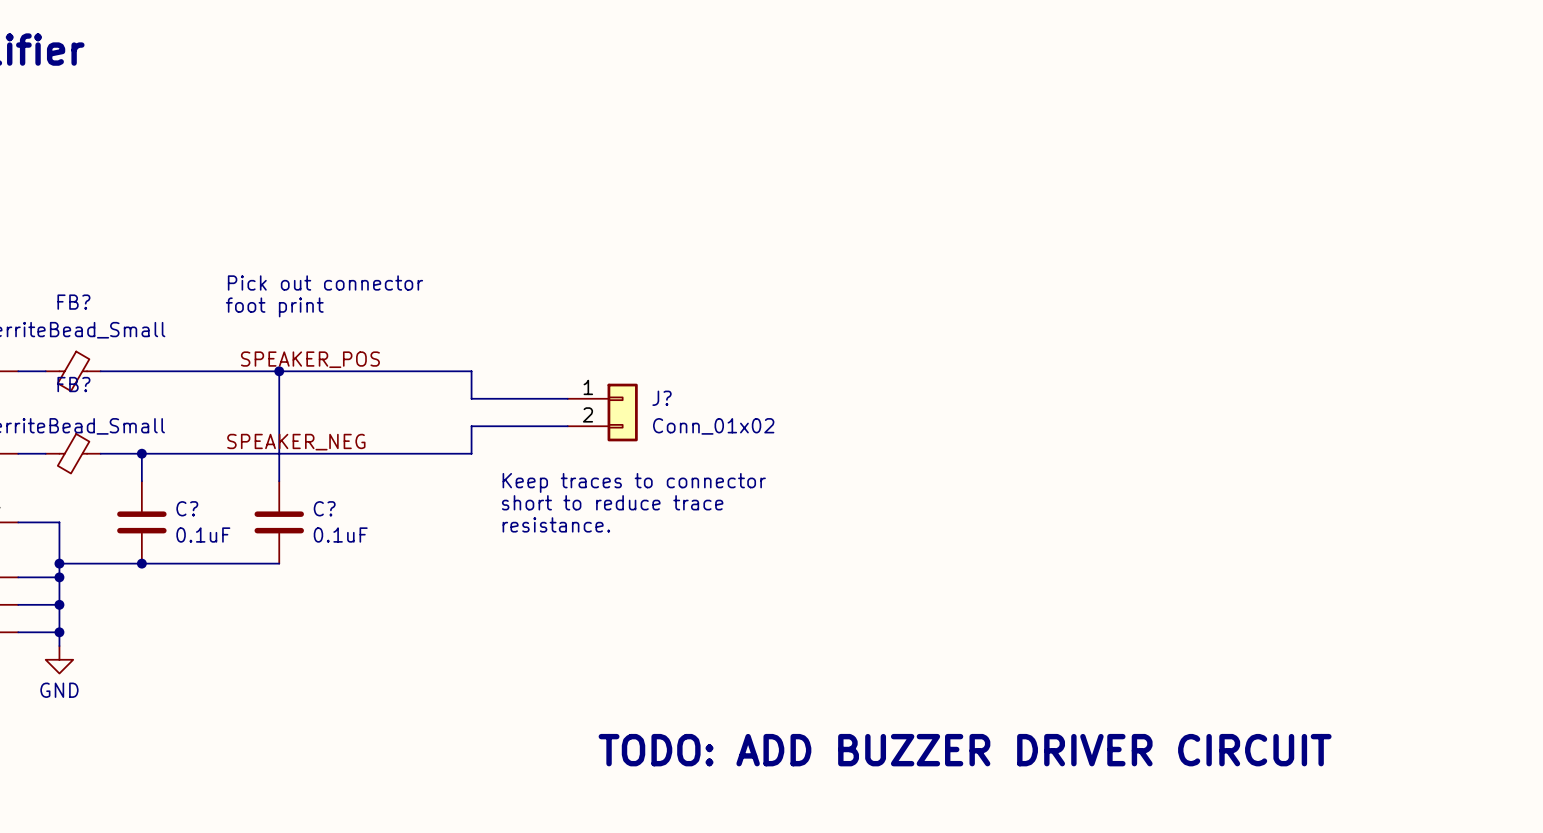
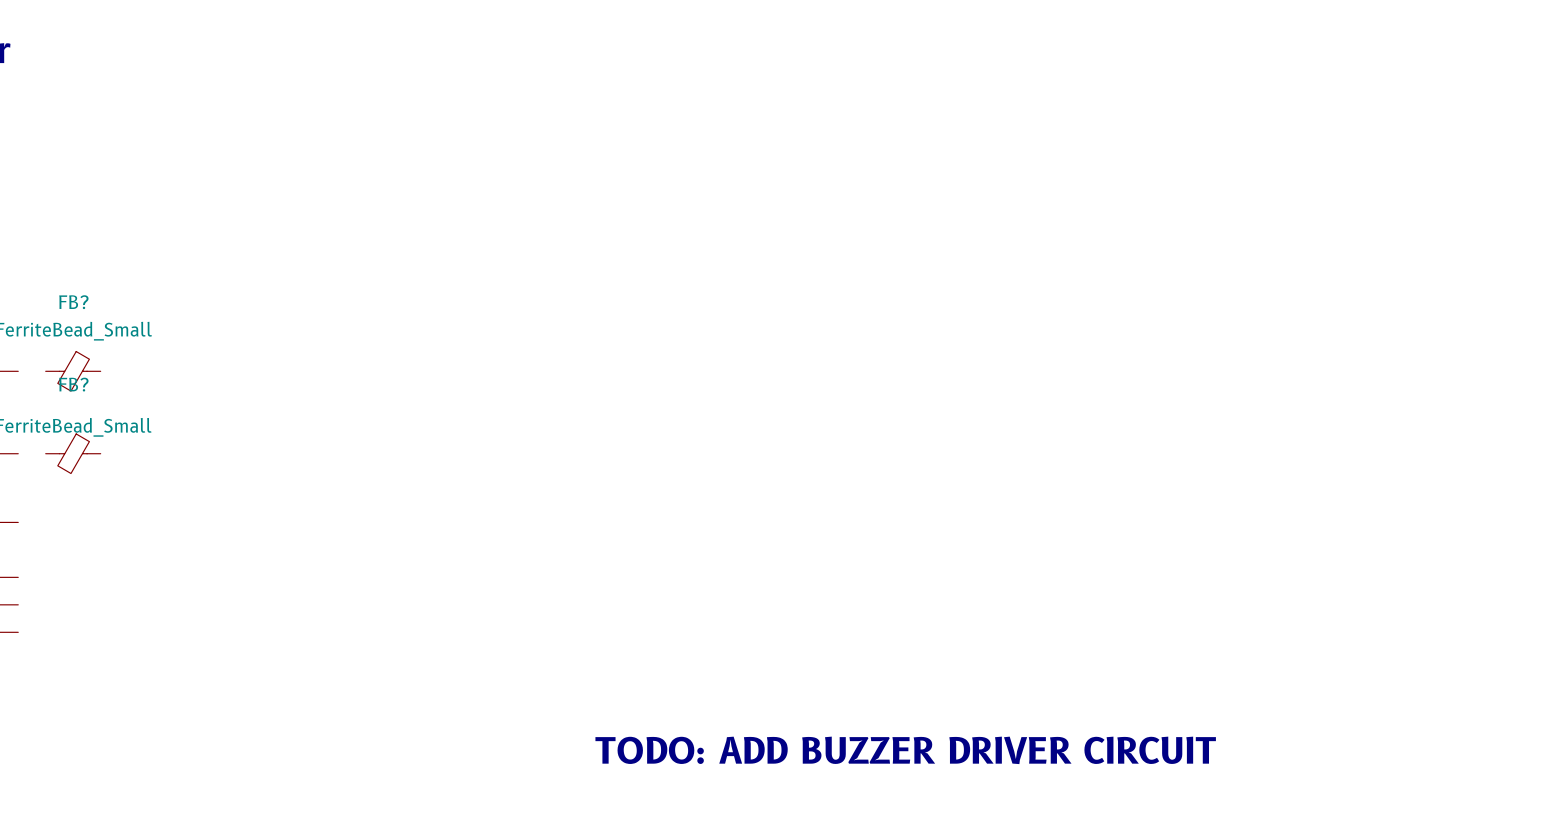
text: Pick out connector (325, 282) -> none
text: foot print (274, 307) -> none
label: SPEAKER_POS (310, 359) -> none
wire: (18, 371) (45, 371) -> none
wire: (100, 371) (471, 371) (471, 398) (567, 398) -> none
wire: (279, 371) (279, 481) -> none
junction: (279, 371) -> none
J?: Conn_01x02 (602, 412) -> none
wire: (567, 426) (471, 426) (471, 453) (100, 453) -> none
label: SPEAKER_NEG (296, 442) -> none
wire: (18, 453) (45, 453) -> none
wire: (141, 453) (141, 481) -> none
junction: (141, 453) -> none
text: Keep traces to connector (634, 482) -> none
text: short to reduce trace (612, 502) -> none
wire: (18, 522) (59, 522) (59, 646) -> none
C?: 0.1uF (141, 522) -> none
C?: 0.1uF (279, 522) -> none
text: resistance. (556, 524) -> none
wire: (59, 563) (279, 563) -> none
junction: (59, 563) -> none
junction: (141, 563) -> none
wire: (18, 577) (59, 577) -> none
junction: (59, 577) -> none
wire: (18, 604) (59, 604) -> none
junction: (59, 604) -> none
wire: (18, 632) (59, 632) -> none
junction: (59, 632) -> none
power symbol: GND (59, 659) -> none

